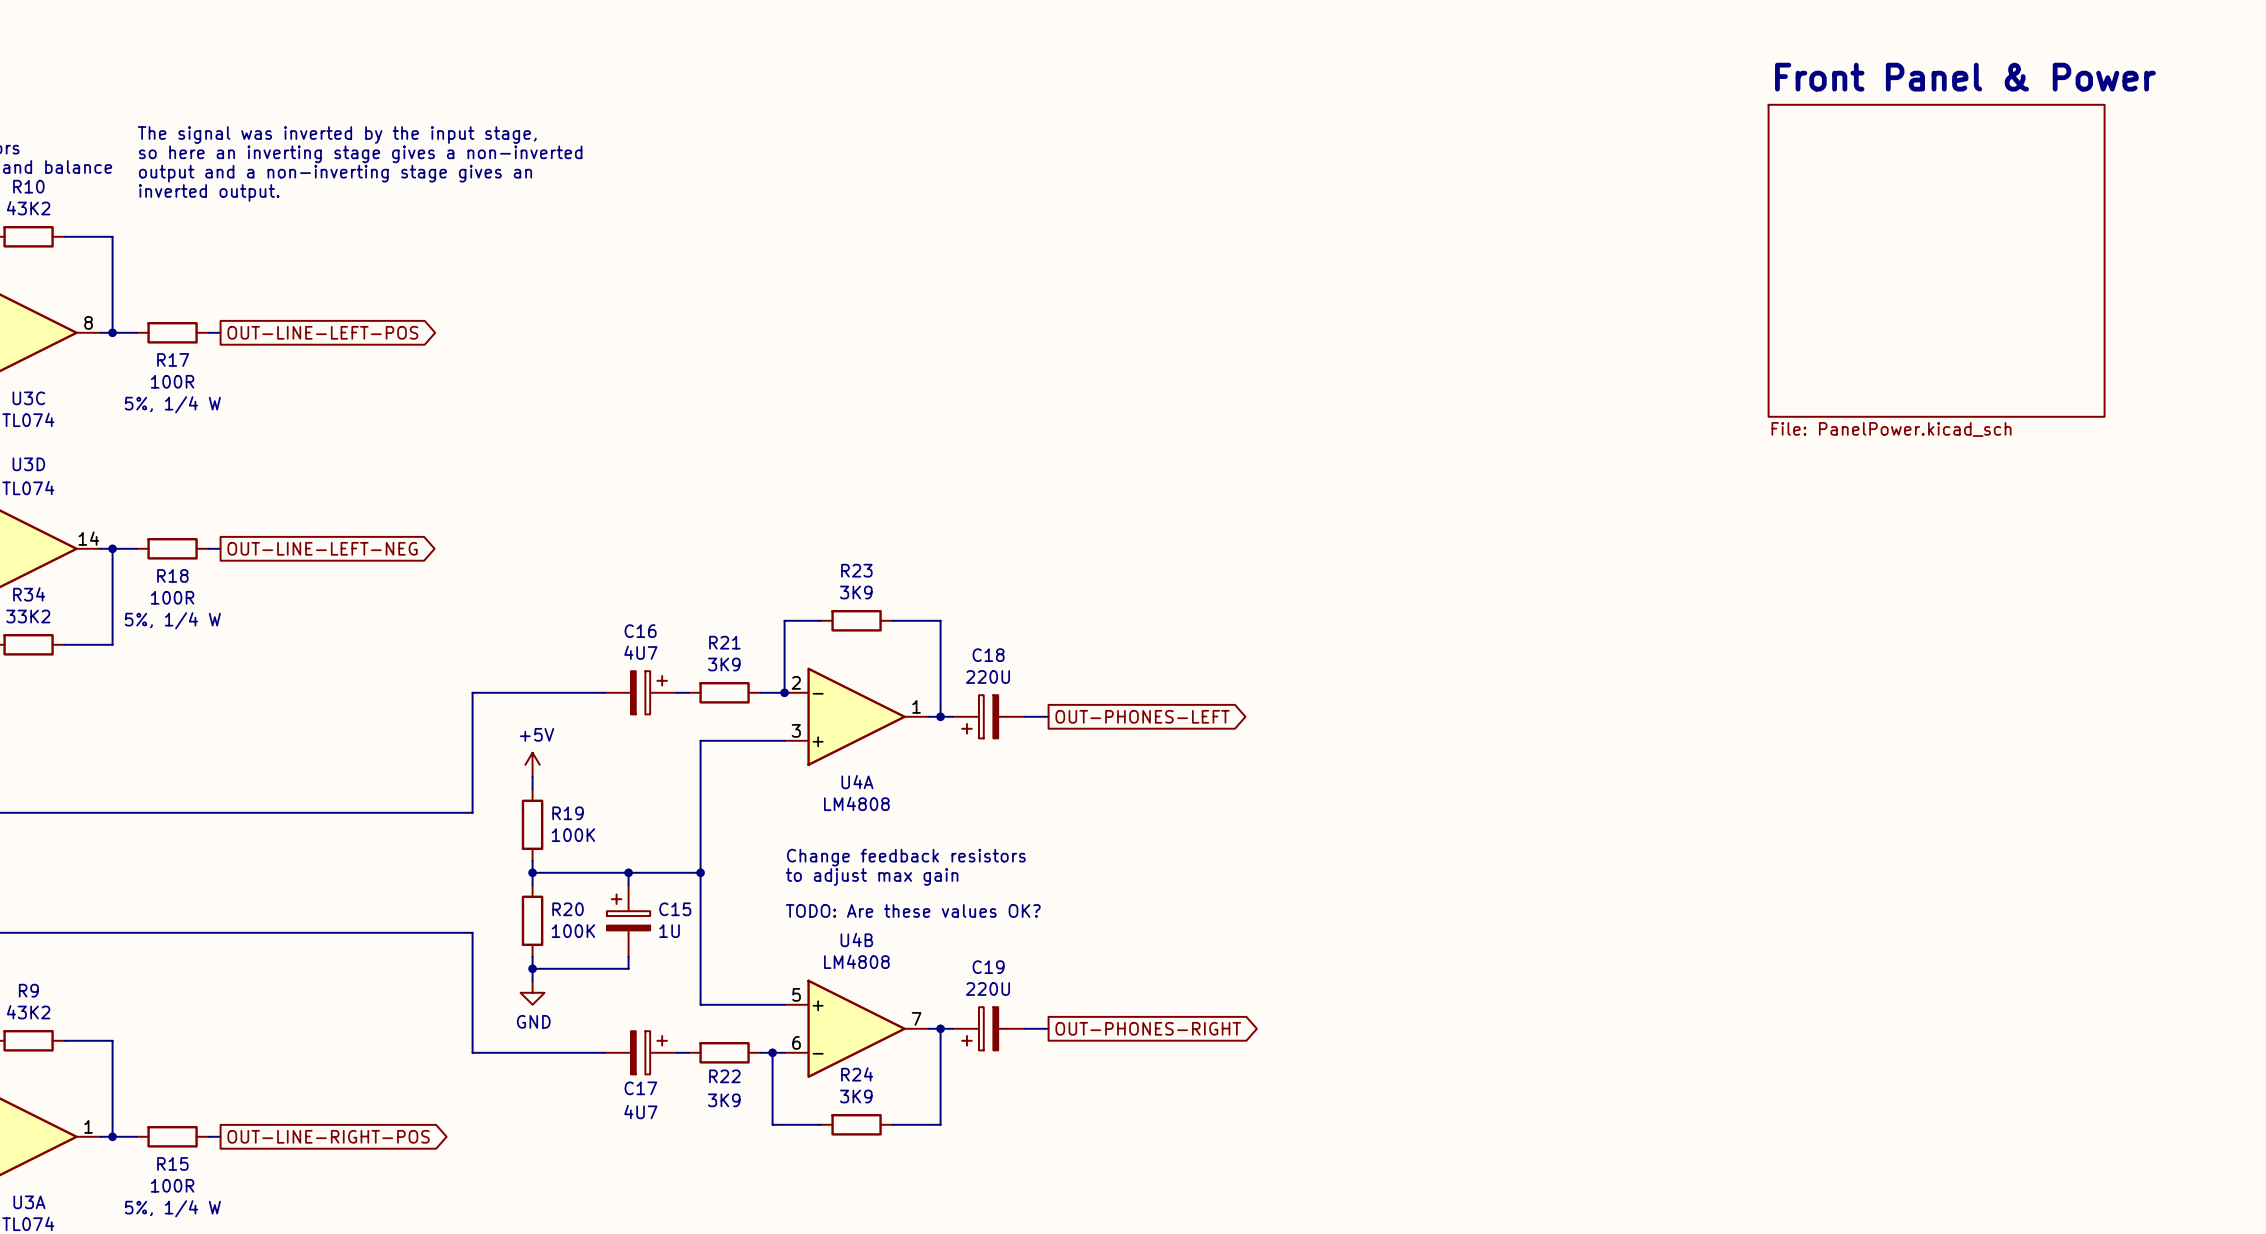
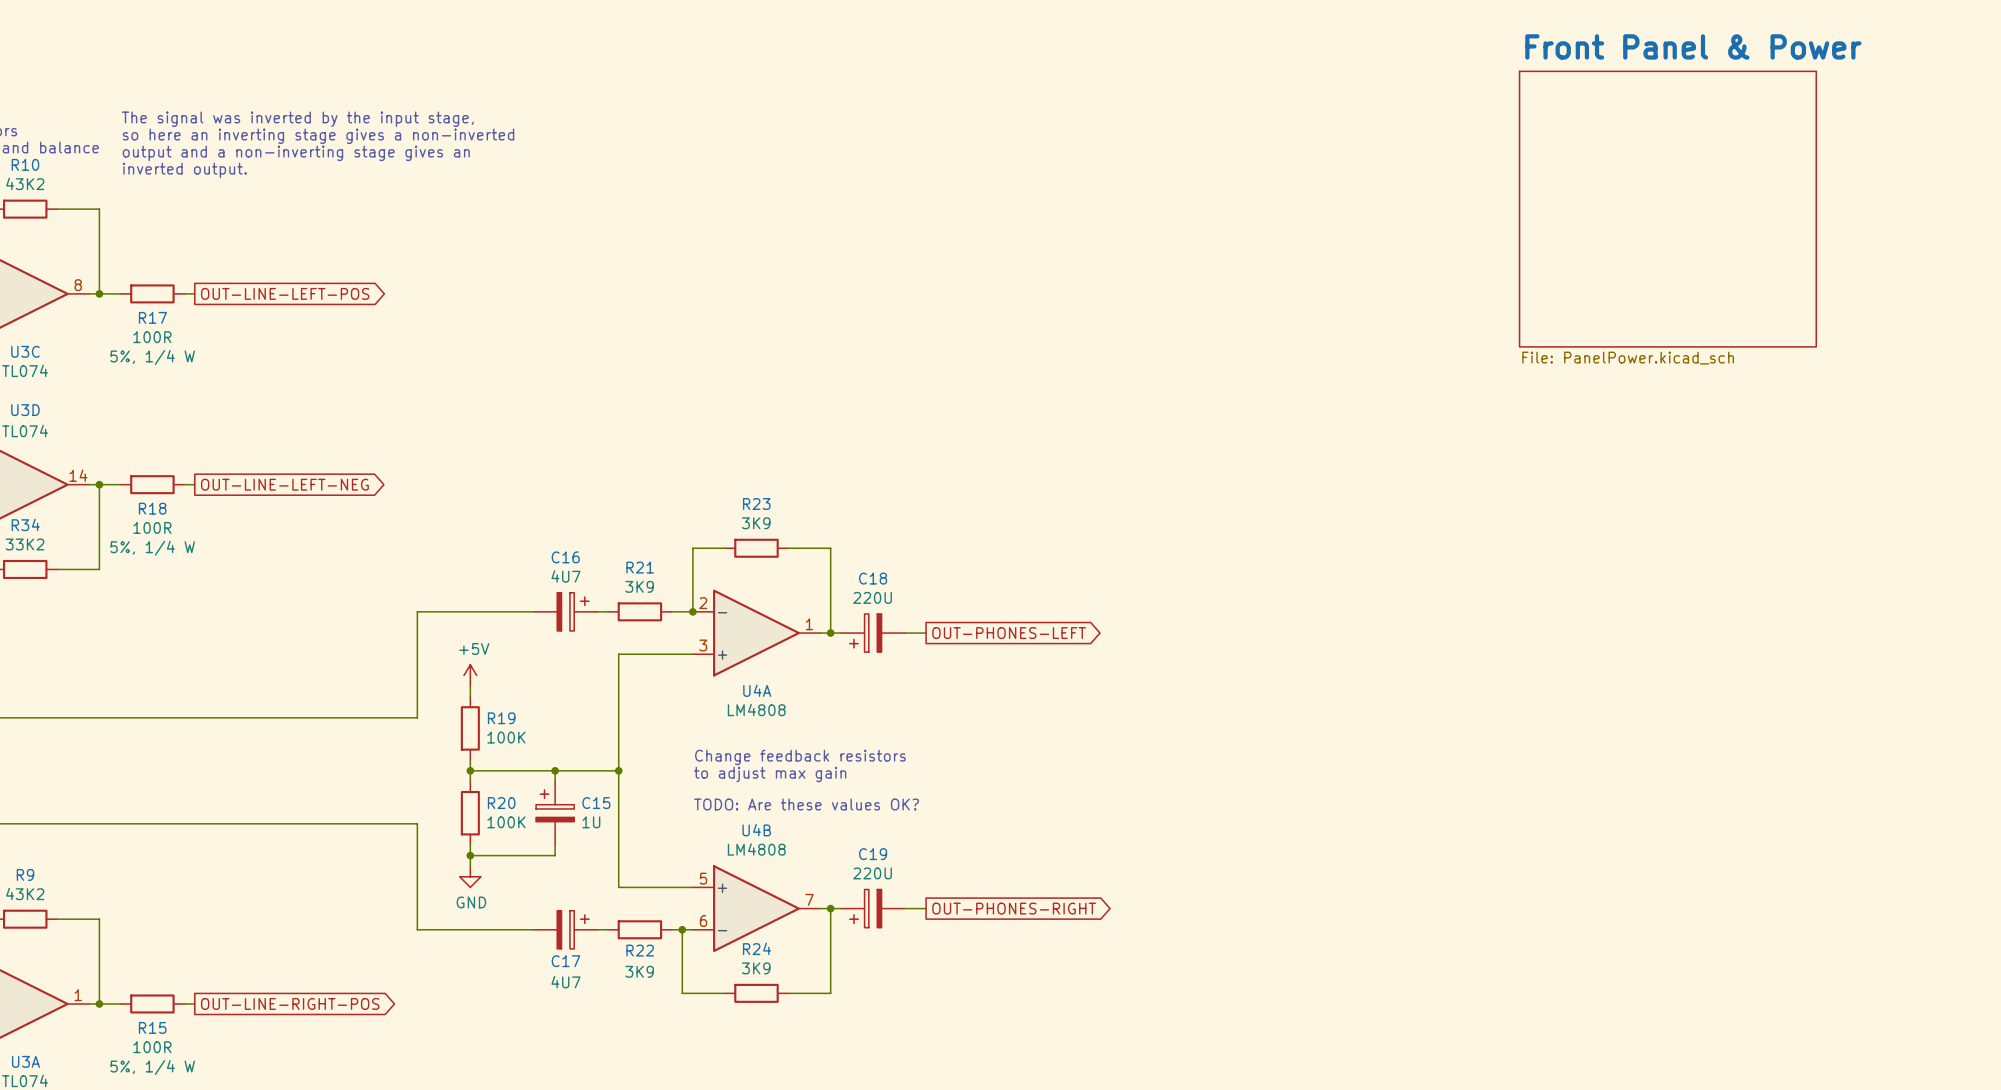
sheet Front Panel & Power position: (1936, 260) -> (1667, 209)

